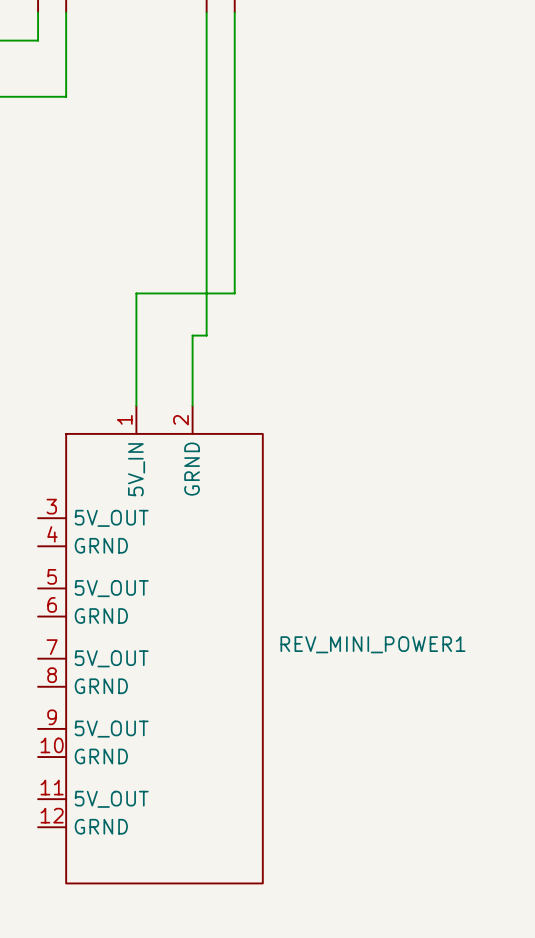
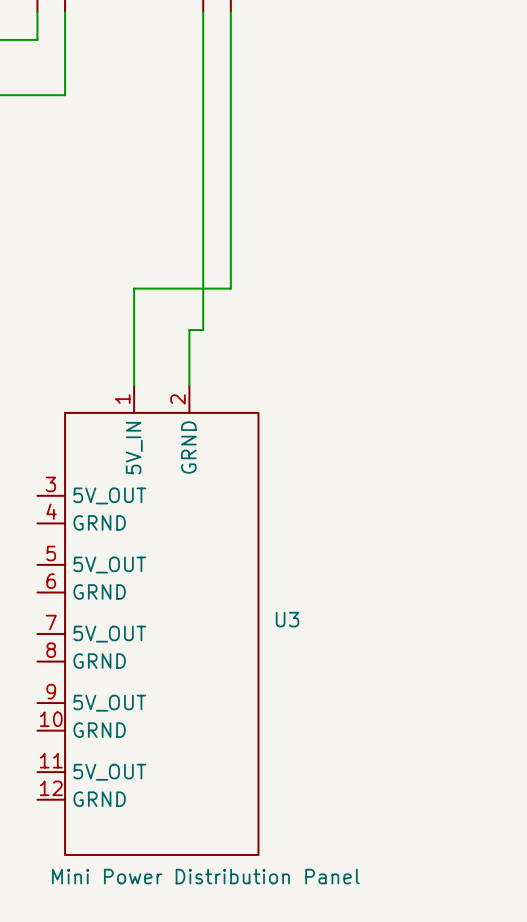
U3: none -> Mini Power Distribution Panel (147, 620)
REV_MINI_POWER1: (150, 644) -> none

